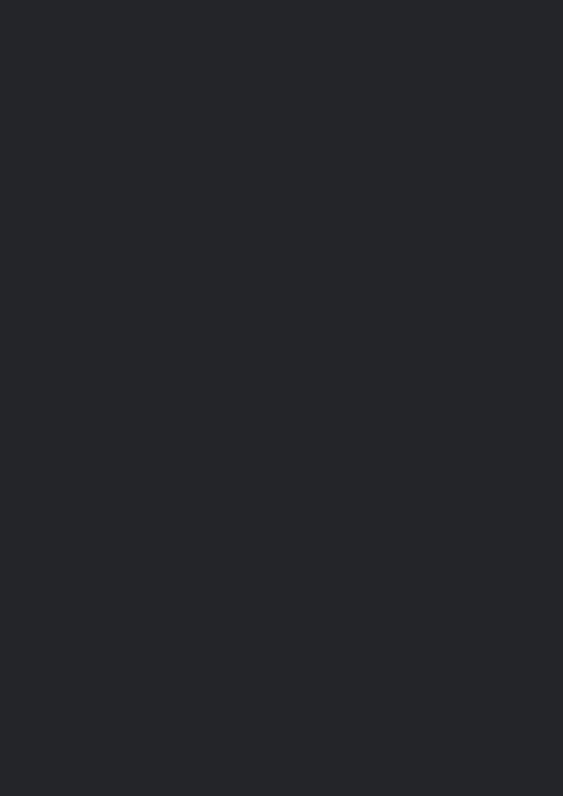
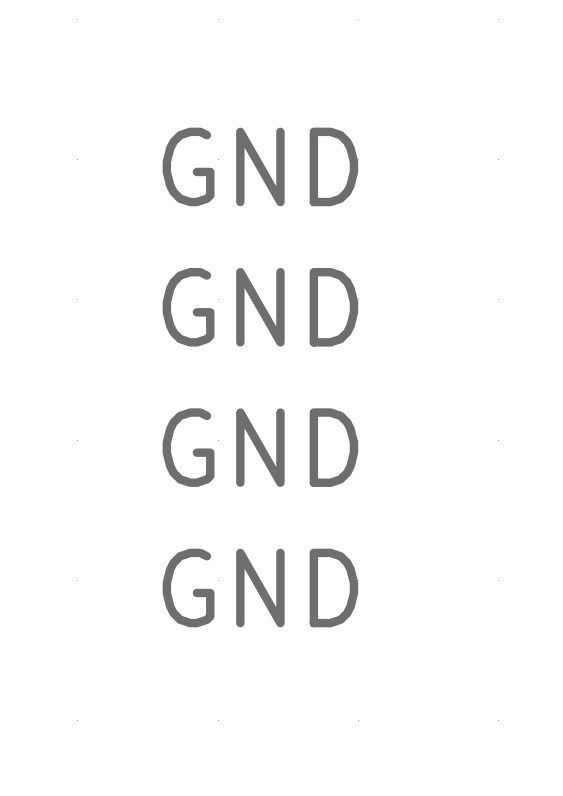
label: none -> GND (260, 166)
label: none -> GND (260, 307)
label: none -> GND (260, 447)
label: none -> GND (260, 588)

